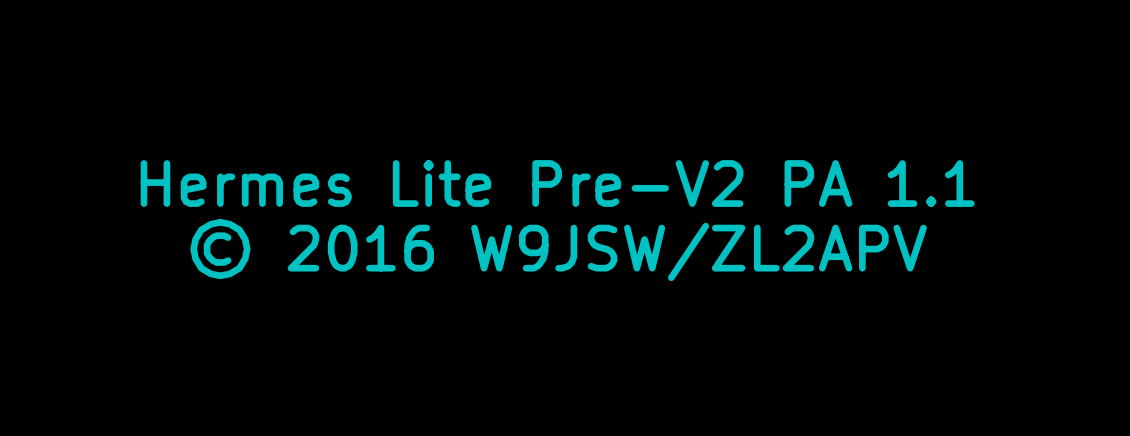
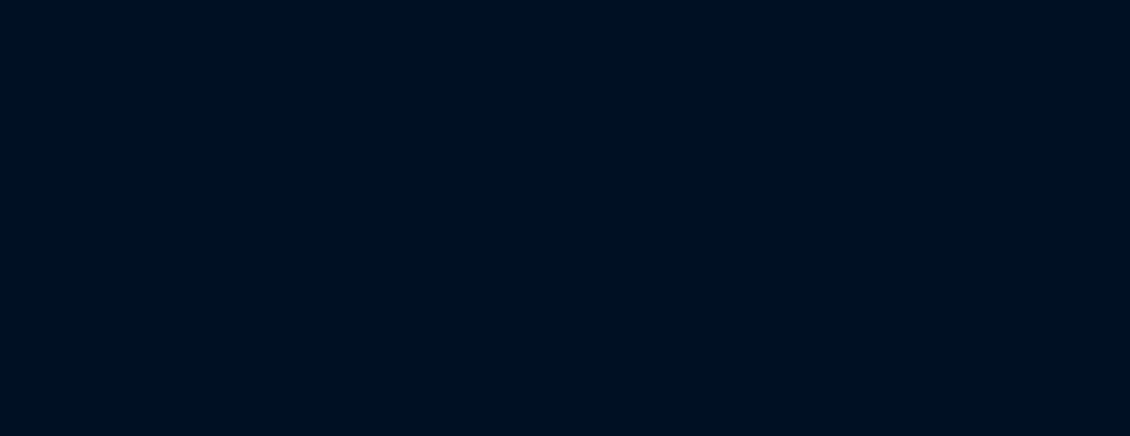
text: Hermes Lite Pre-V2 PA 1.1 (557, 183) -> none
text: © 2016 W9JSW/ZL2APV (558, 250) -> none

